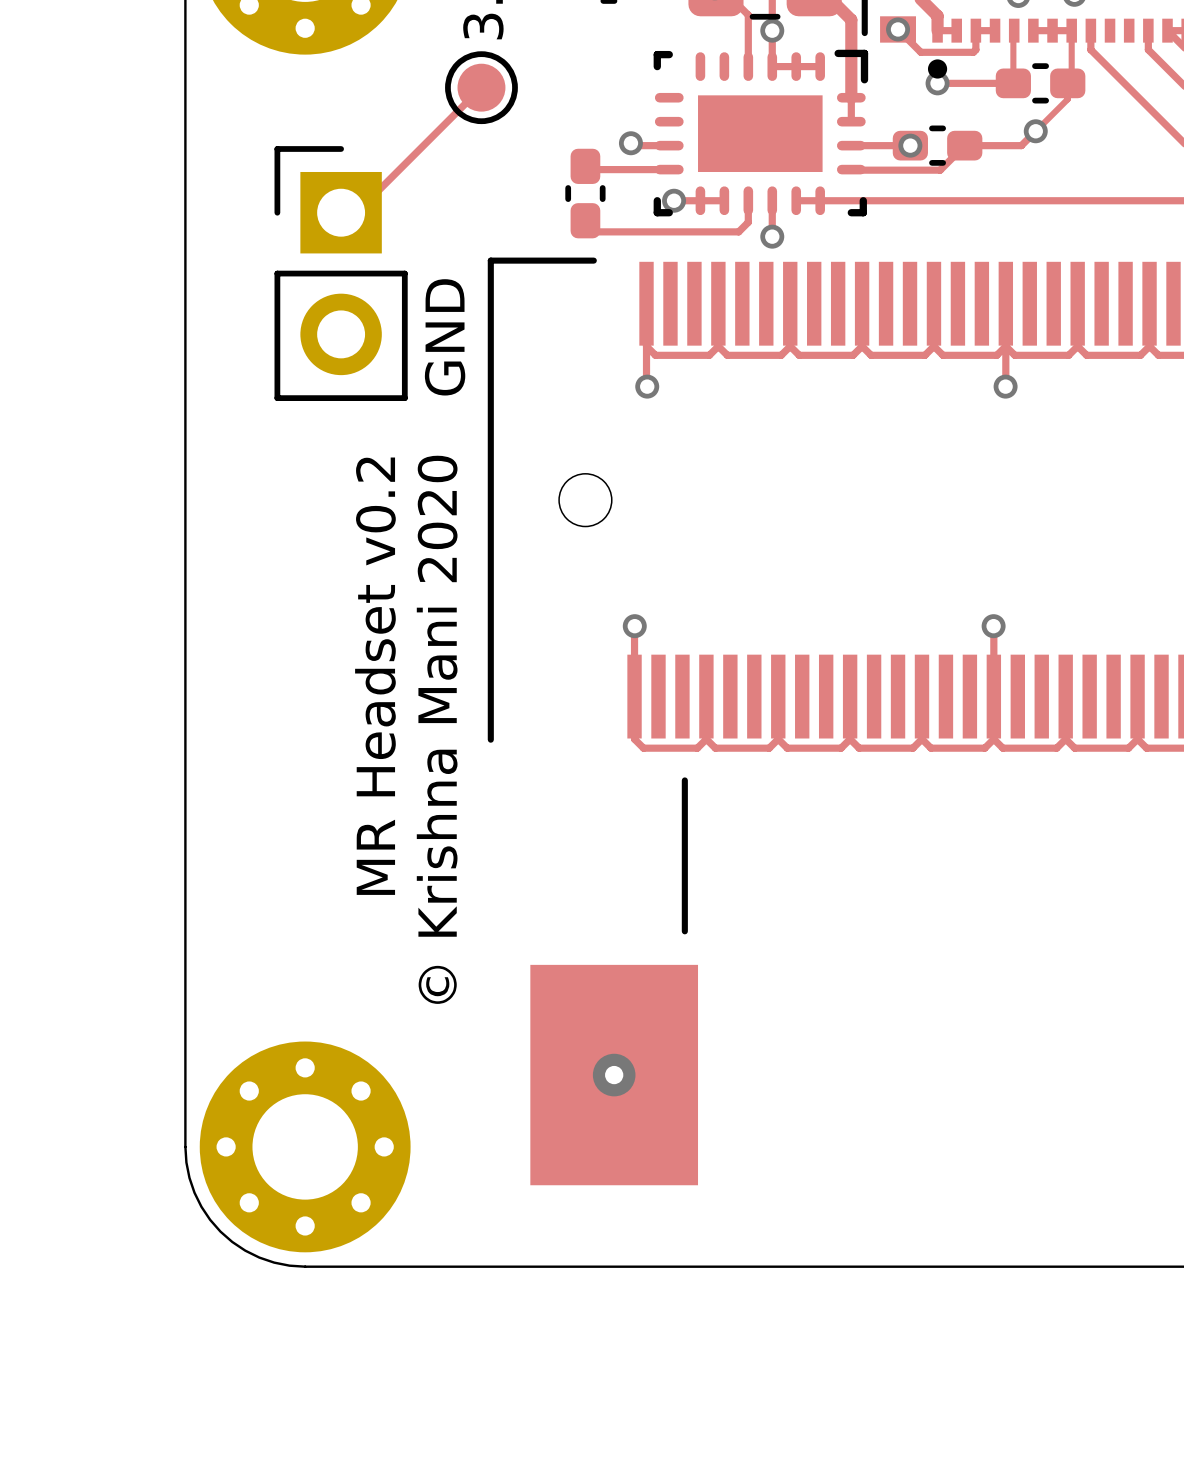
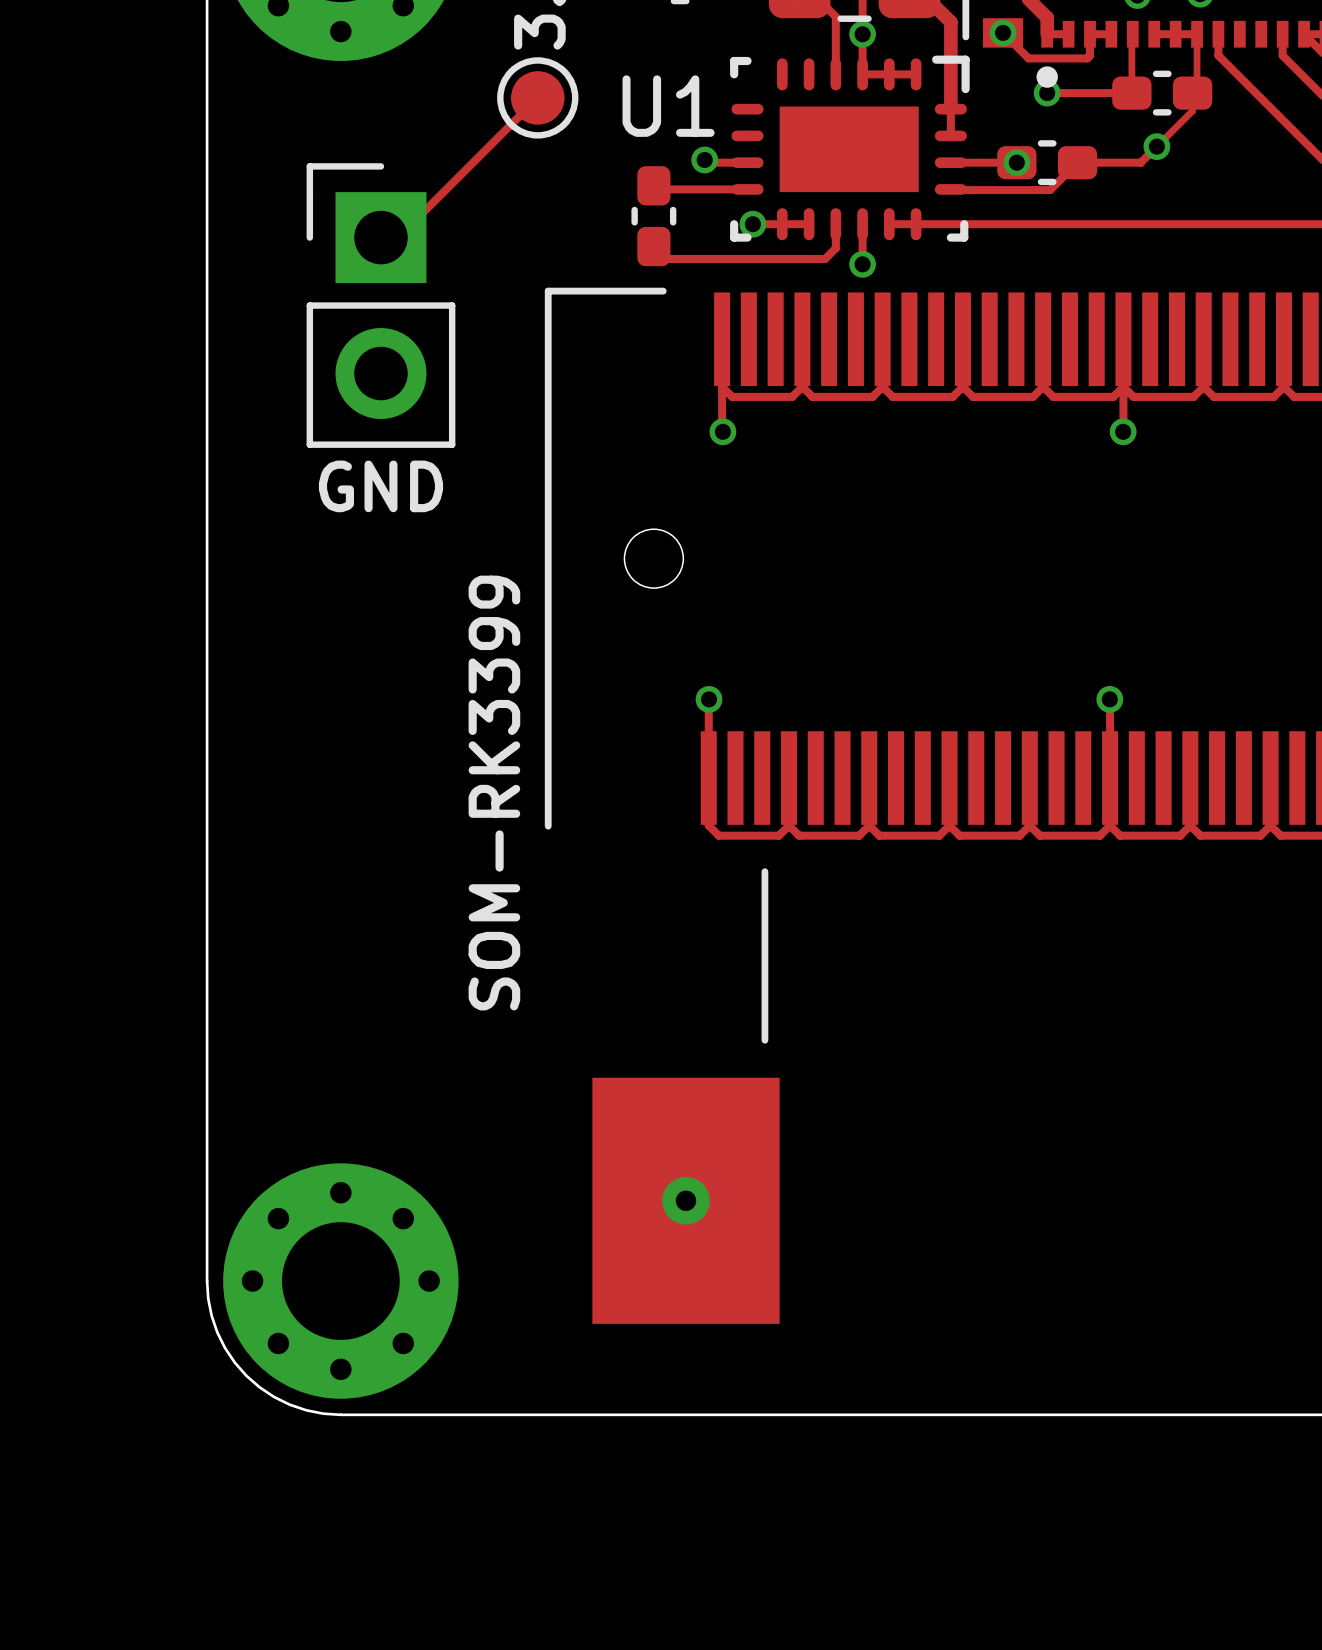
U1 name: none -> U1 (668, 106)
text: GND (445, 337) -> none
text: MR Headset v0.2 (375, 676) -> GND (380, 486)
text: none -> SOM-RK3399 (494, 793)
text: © Krishna Mani 2020 (437, 729) -> none

